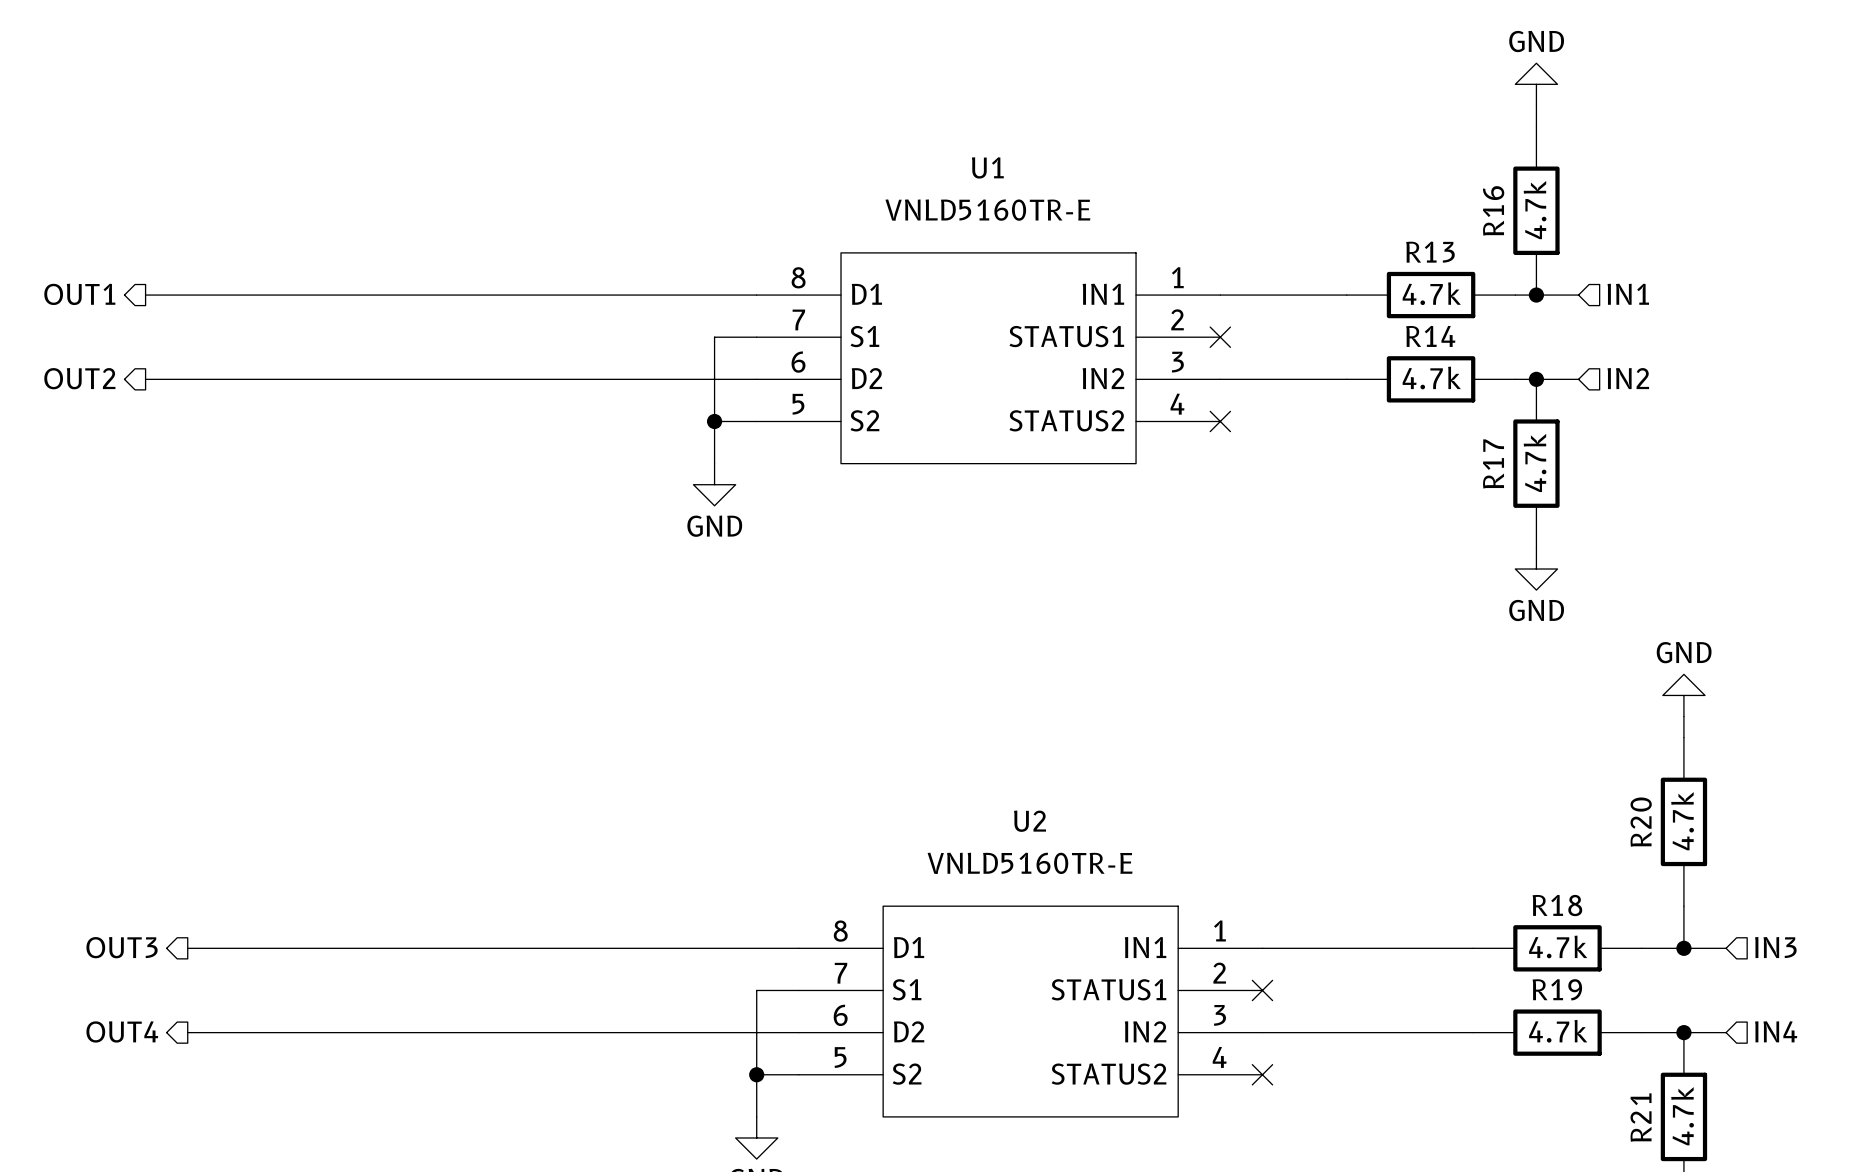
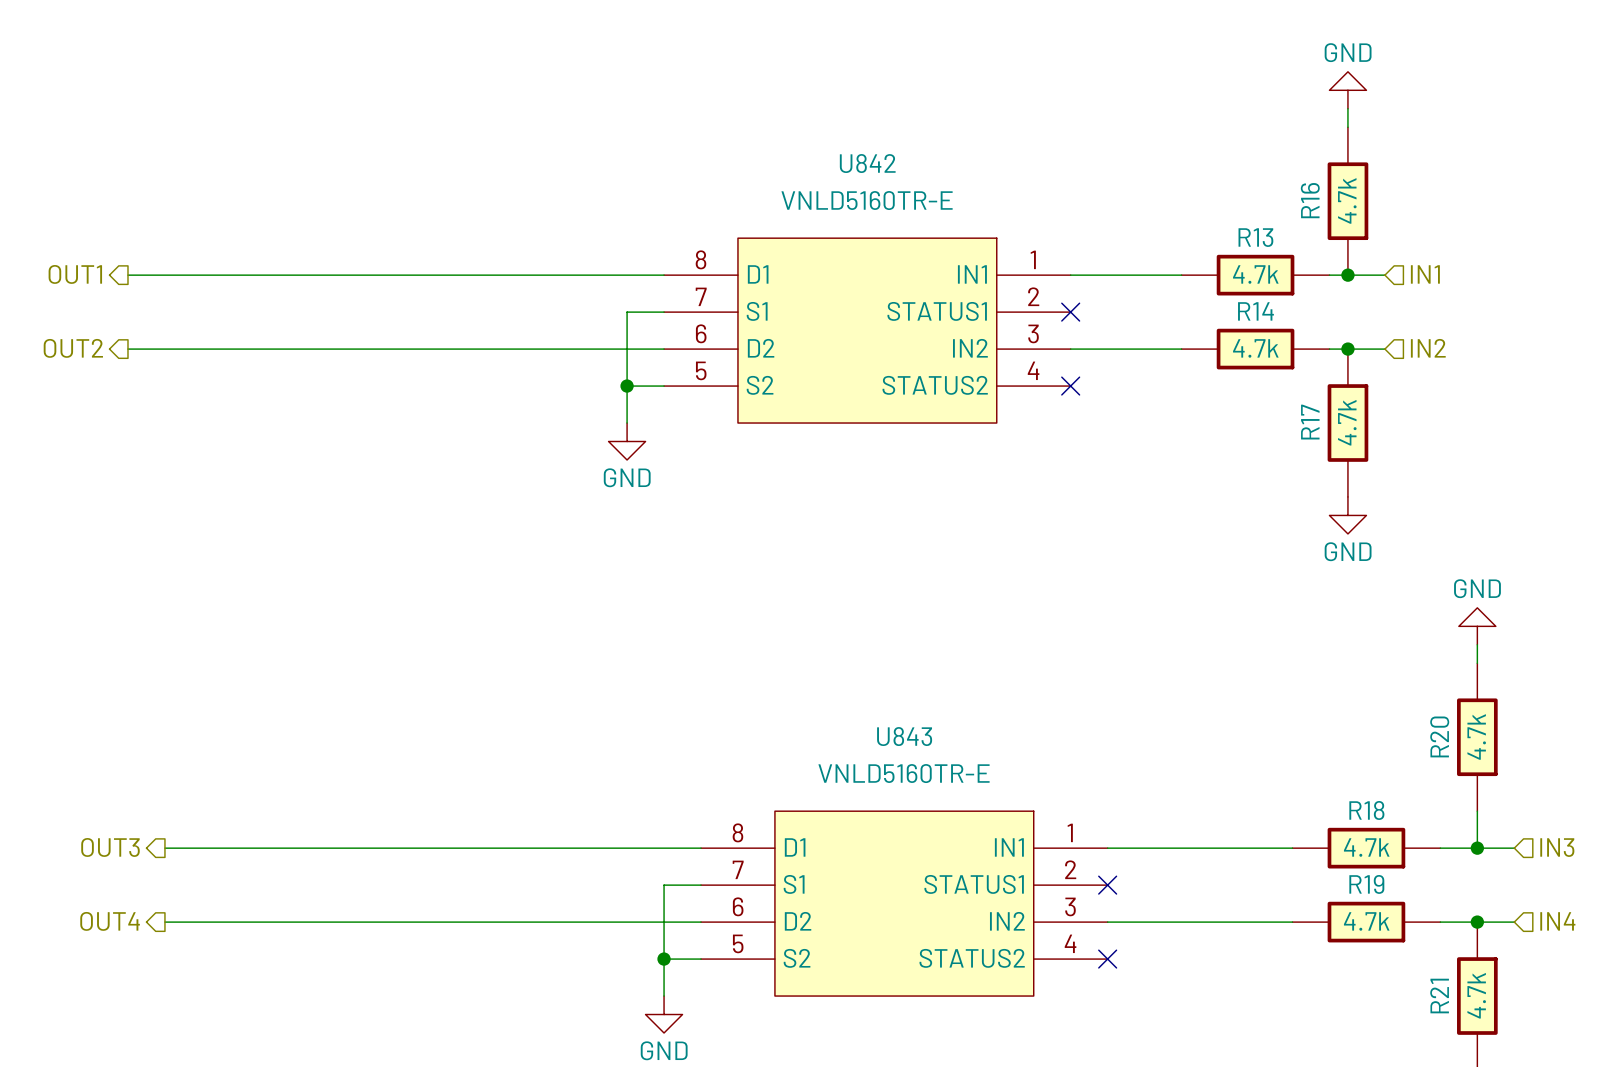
U1 name: U1 (987, 167) -> U842 (867, 163)
U2 name: U2 (1030, 821) -> U843 (904, 736)

